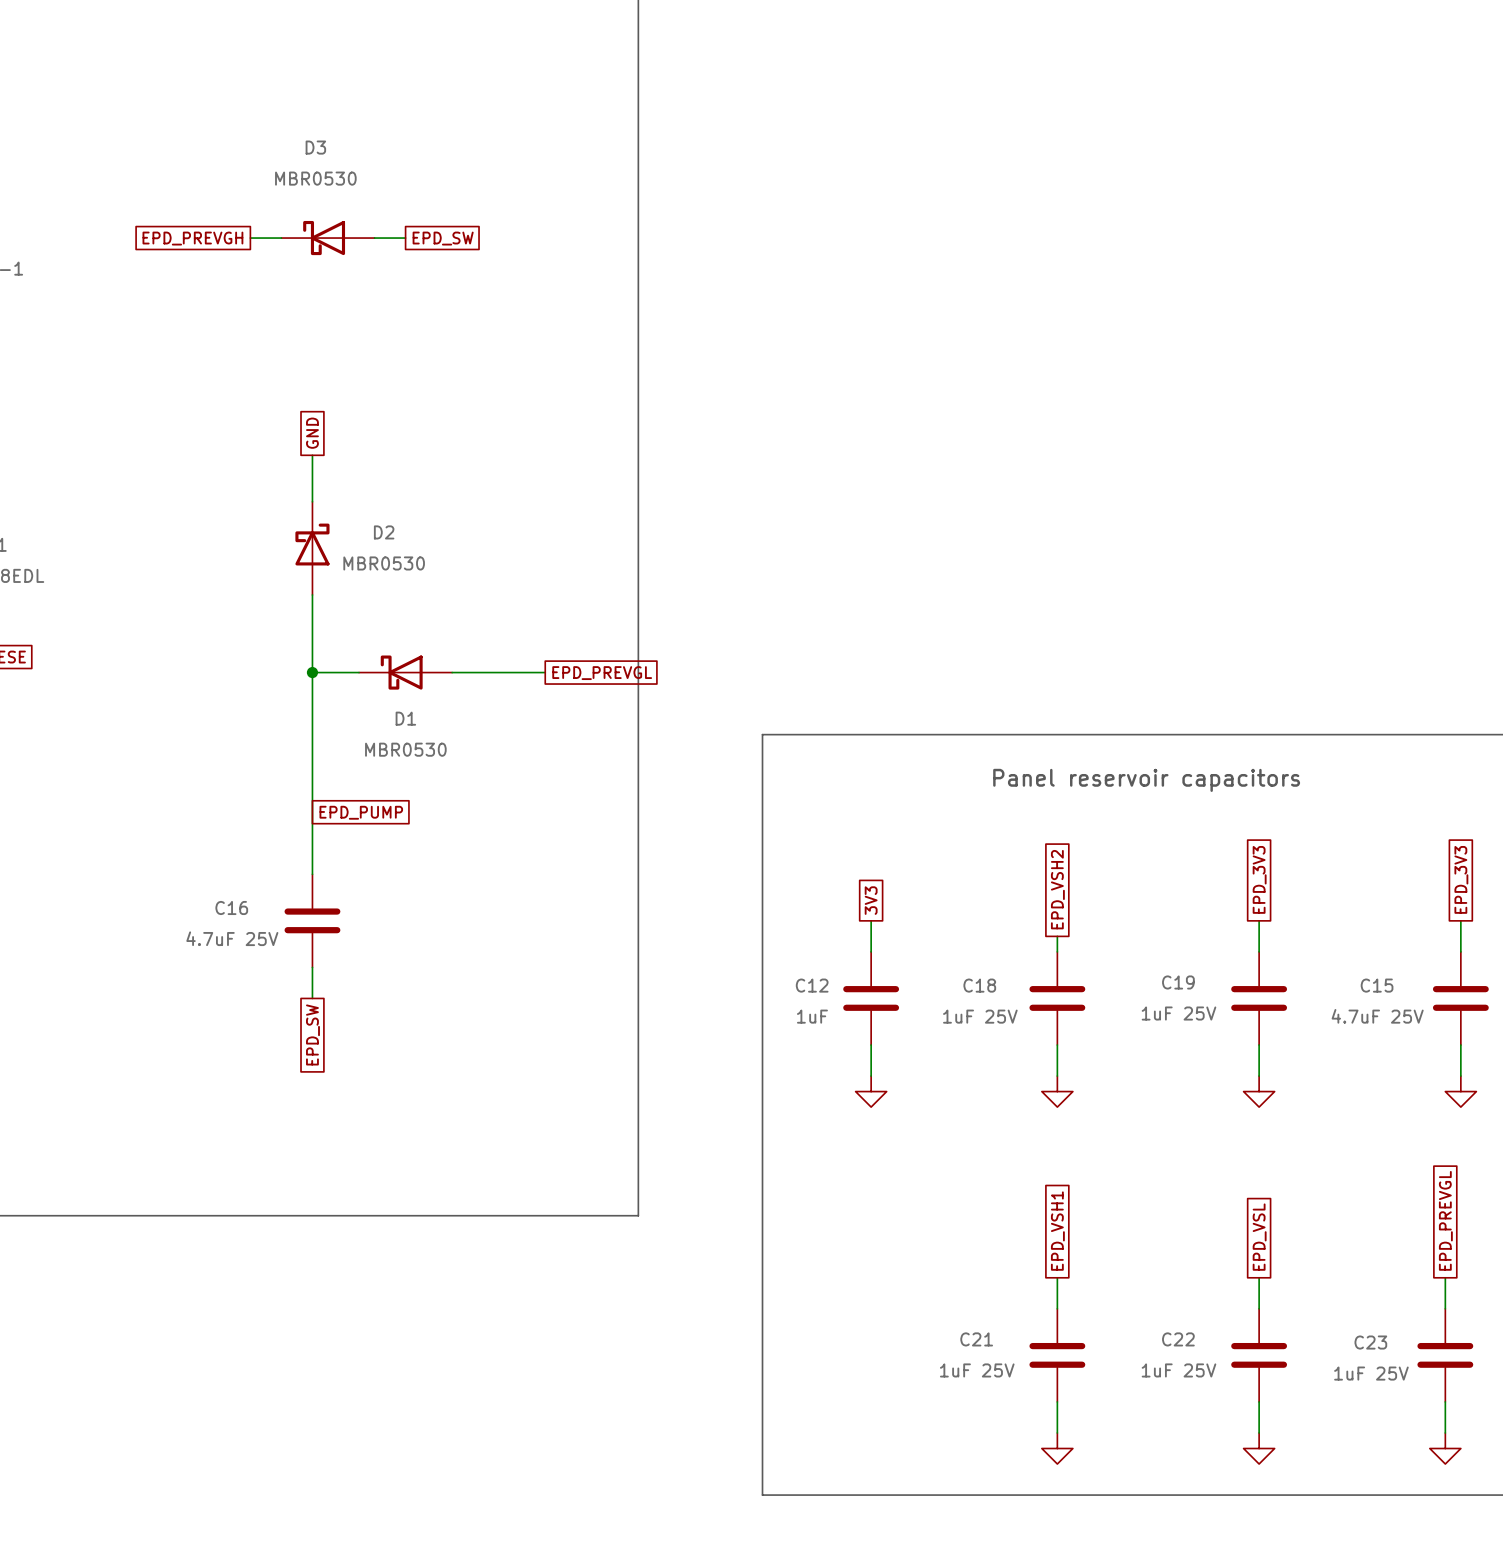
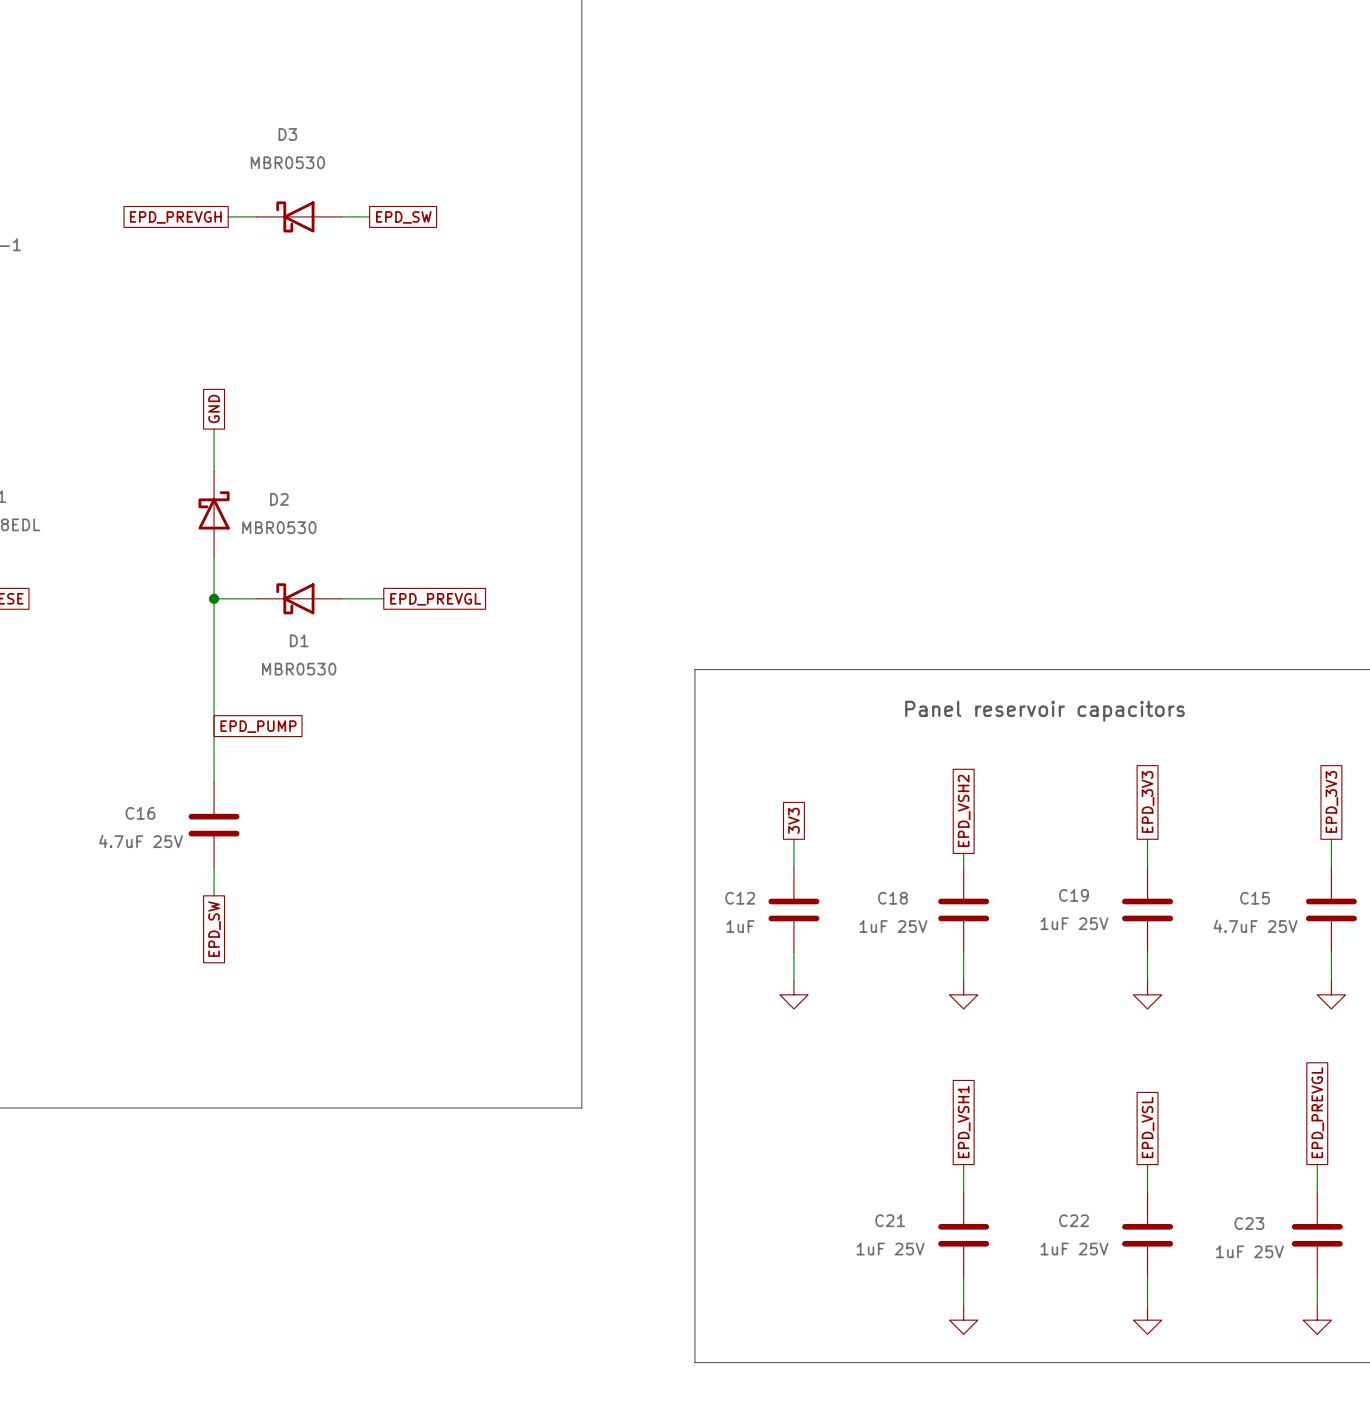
global label position: GND (312, 433) -> GND (214, 408)
wire: (312, 455) (312, 501) -> (214, 429) (214, 471)
D2 position: (312, 548) -> (214, 513)
wire: (312, 594) (312, 874) -> none
wire: none -> (214, 556) (214, 782)
junction: none -> (214, 598)
wire: none -> (341, 598) (383, 598)
wire: (312, 672) (359, 672) -> (214, 598) (256, 598)
junction: (312, 672) -> none
D1 position: (405, 672) -> (298, 598)
wire: (452, 672) (545, 672) -> none
global label position: EPD_PREVGL (602, 673) -> EPD_PREVGL (435, 599)
global label position: EPD_PUMP (361, 812) -> EPD_PUMP (258, 726)
C16 position: (312, 920) -> (214, 825)
wire: (312, 967) (312, 998) -> (214, 867) (214, 895)
global label position: EPD_SW (312, 1034) -> EPD_SW (214, 929)

